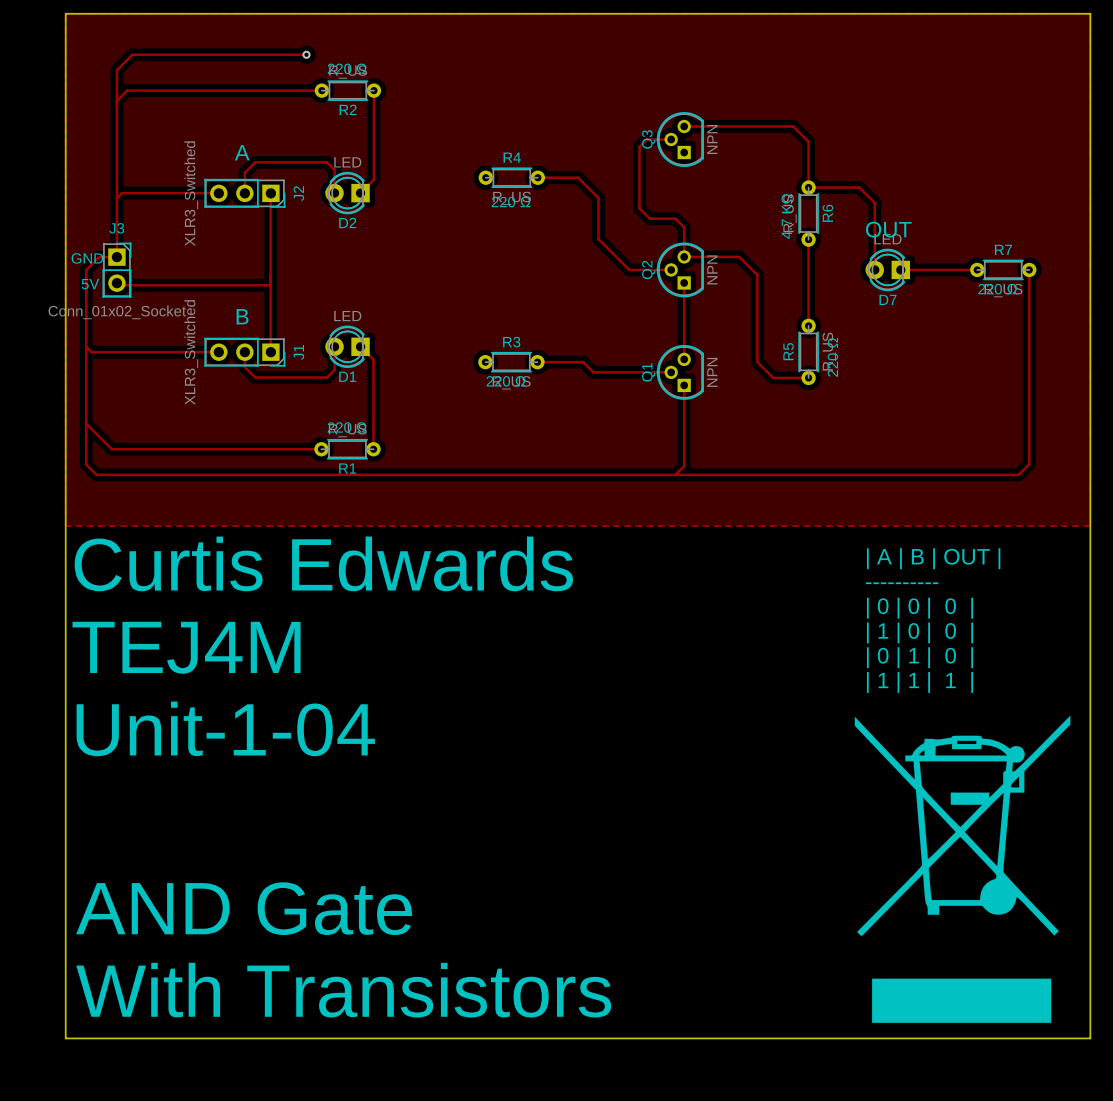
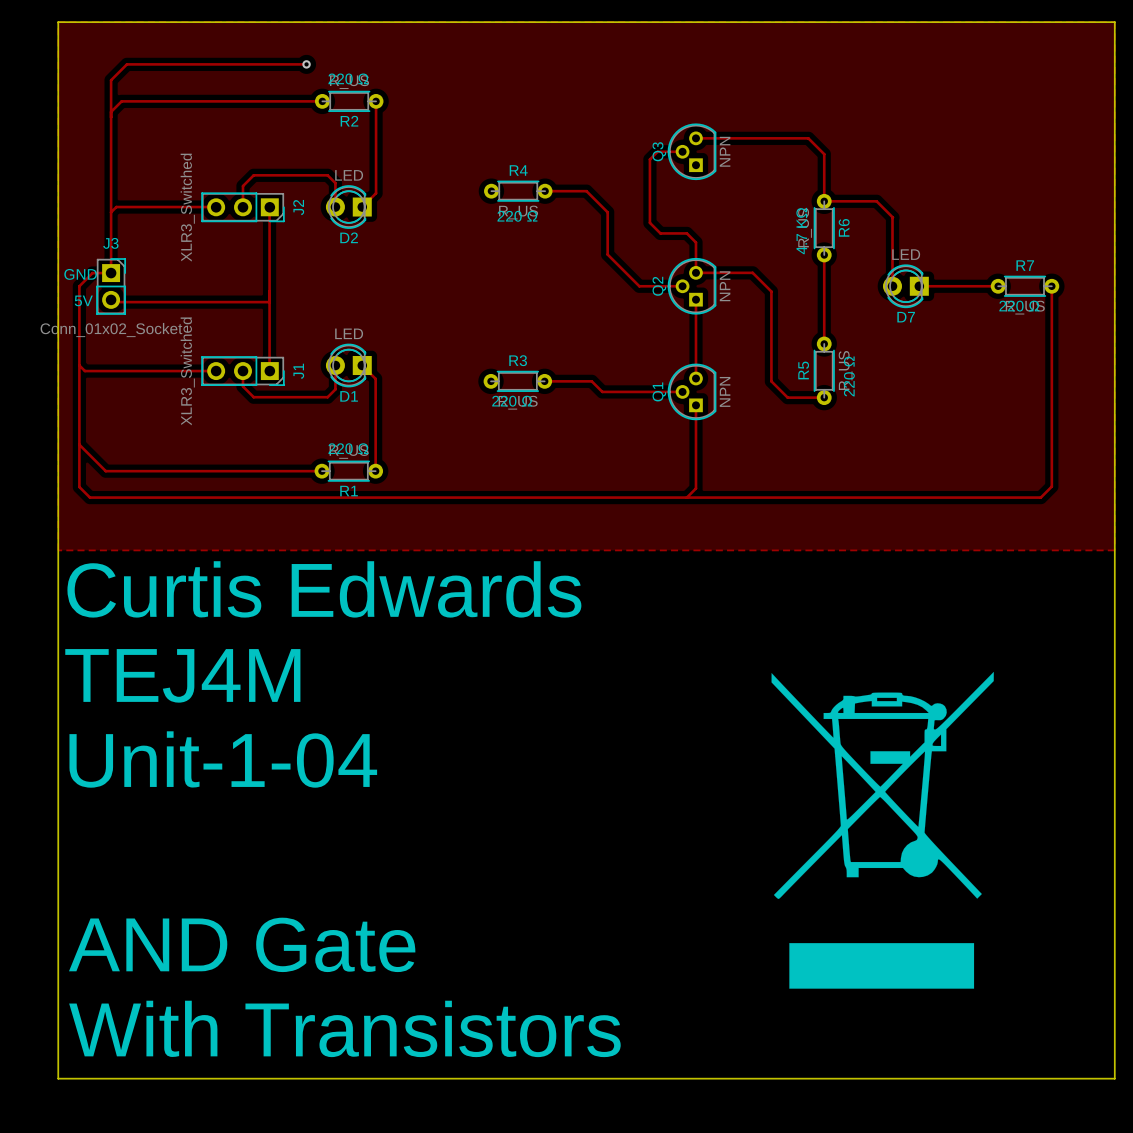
text: A (242, 152) -> none
text: OUT (888, 229) -> none
text: B (242, 316) -> none
text: | A | B | OUT | (933, 558) -> none
text: ---------- (902, 583) -> none
text: | 0 | 0 | 0 | (920, 608) -> none
text: | 1 | 0 | 0 | (920, 632) -> none
text: | 0 | 1 | 0 | (920, 657) -> none
text: | 1 | 1 | 1 | (920, 682) -> none
drawing position: (962, 869) -> (882, 830)

